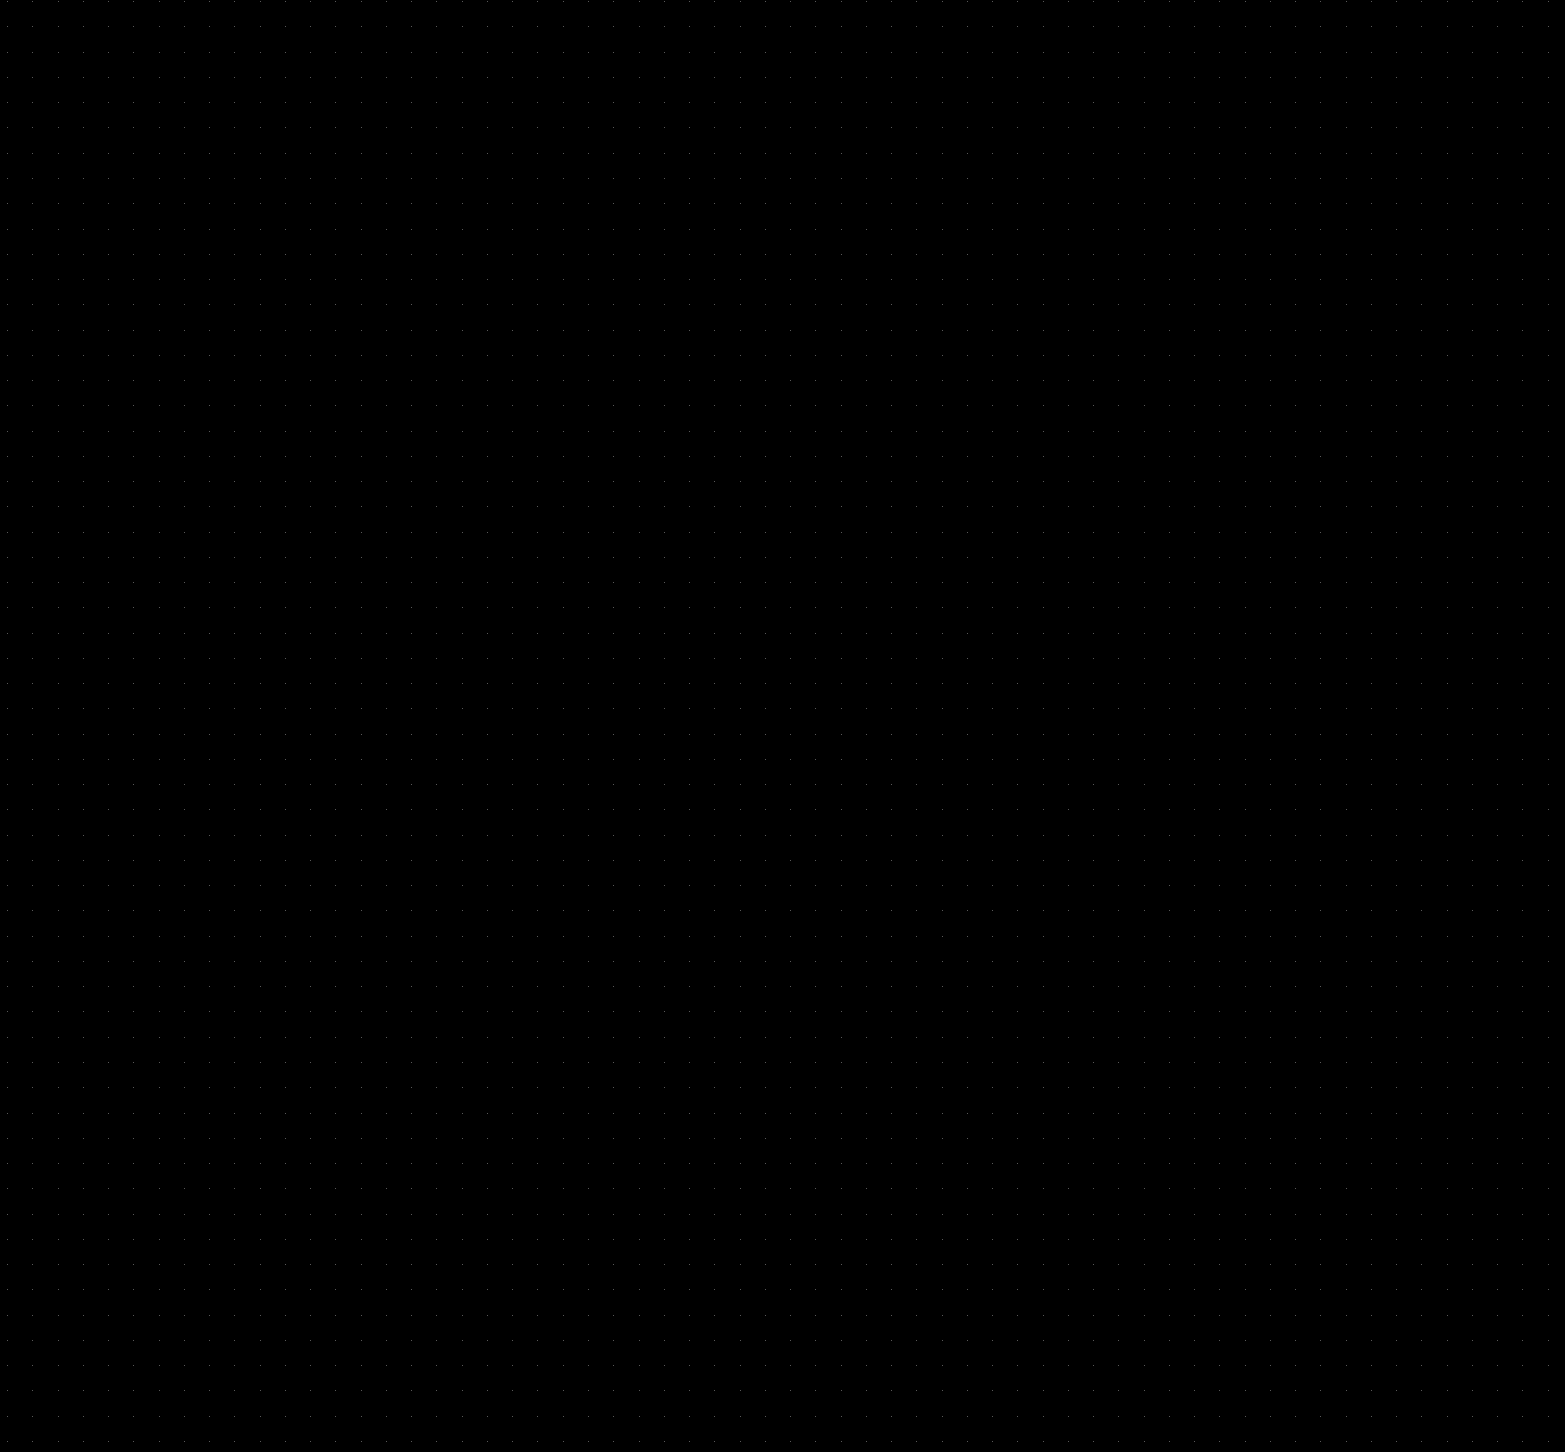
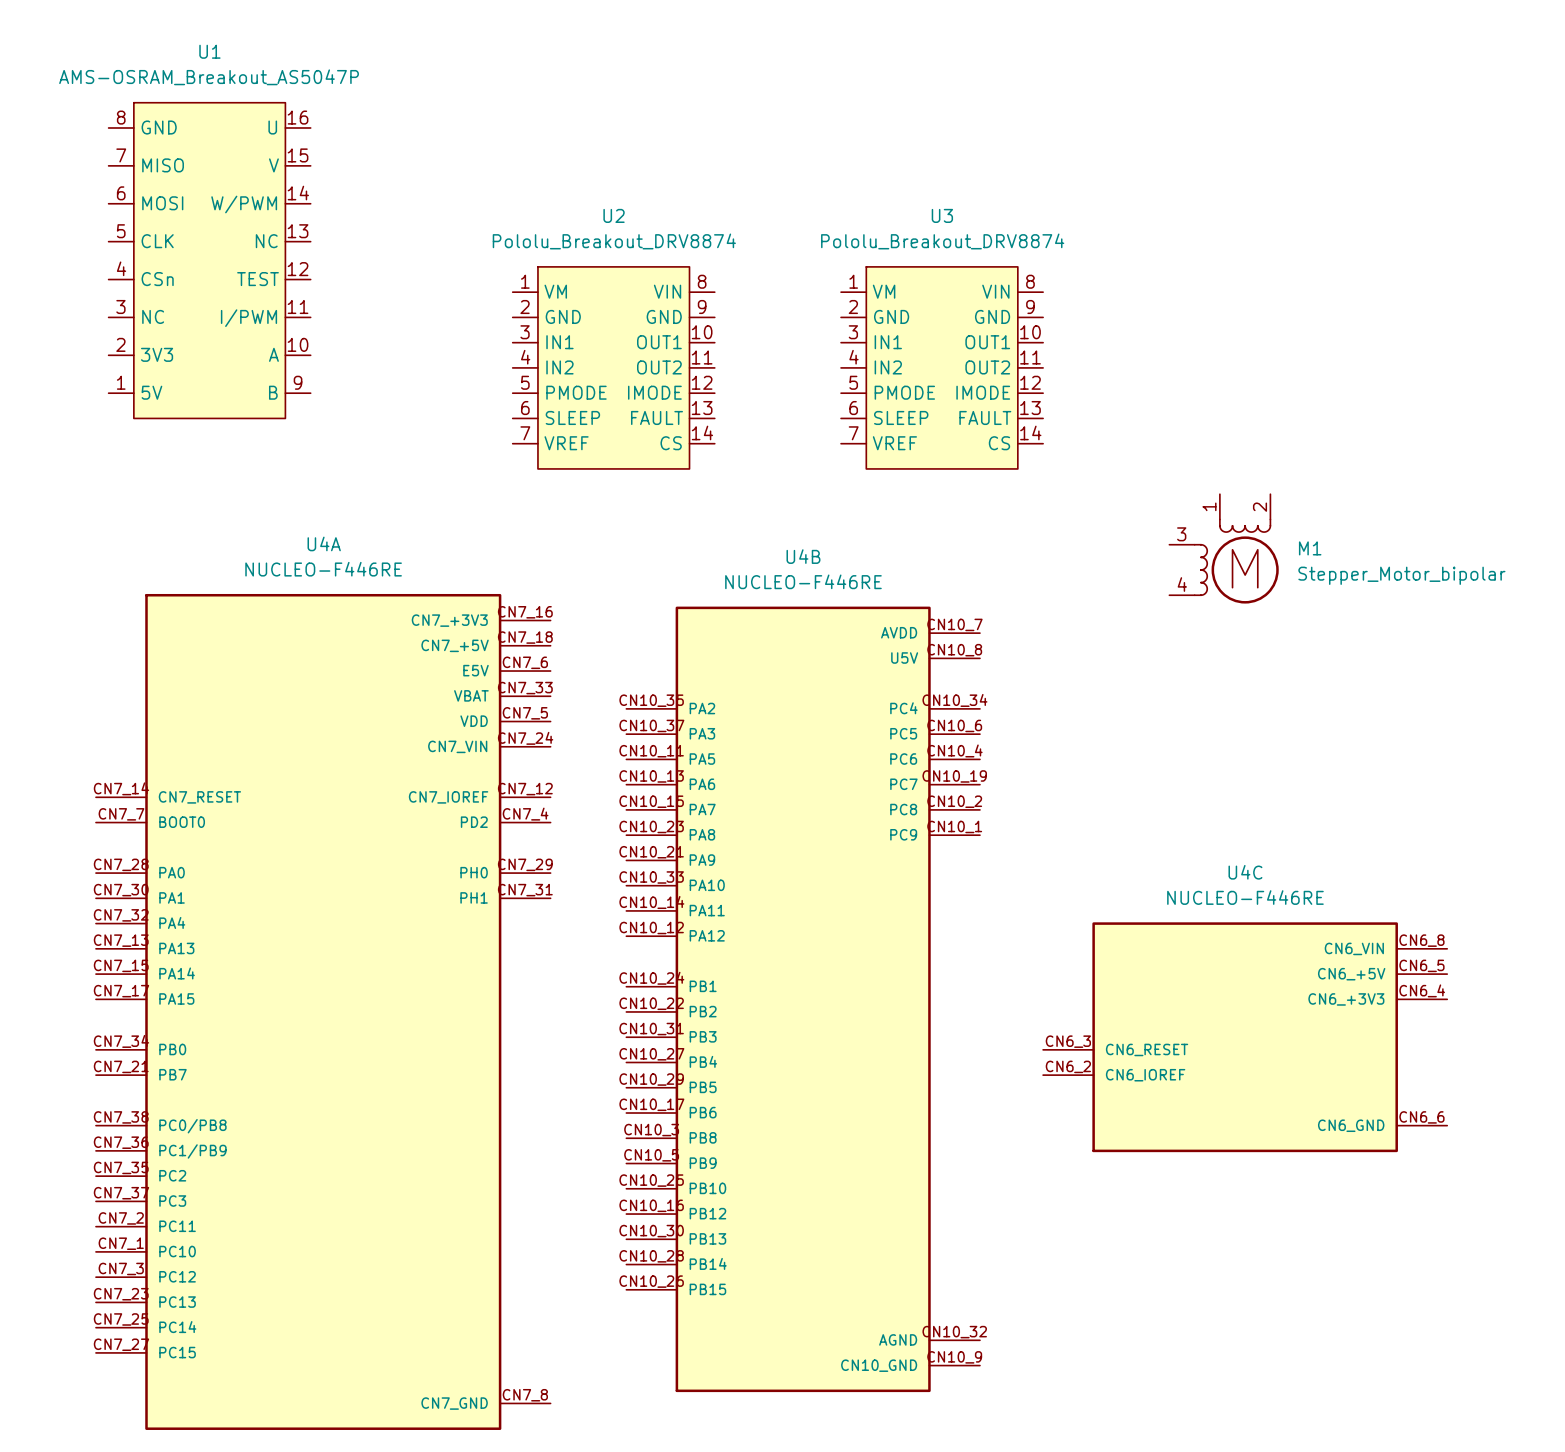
U1: none -> AMS-OSRAM_Breakout_AS5047P (209, 260)
U2: none -> Pololu_Breakout_DRV8874 (613, 367)
U3: none -> Pololu_Breakout_DRV8874 (942, 367)
M1: none -> Stepper_Motor_bipolar (1224, 548)
U4B: none -> NUCLEO-F446RE (803, 999)
U4A: none -> NUCLEO-F446RE (323, 1011)
U4C: none -> NUCLEO-F446RE (1245, 1037)

